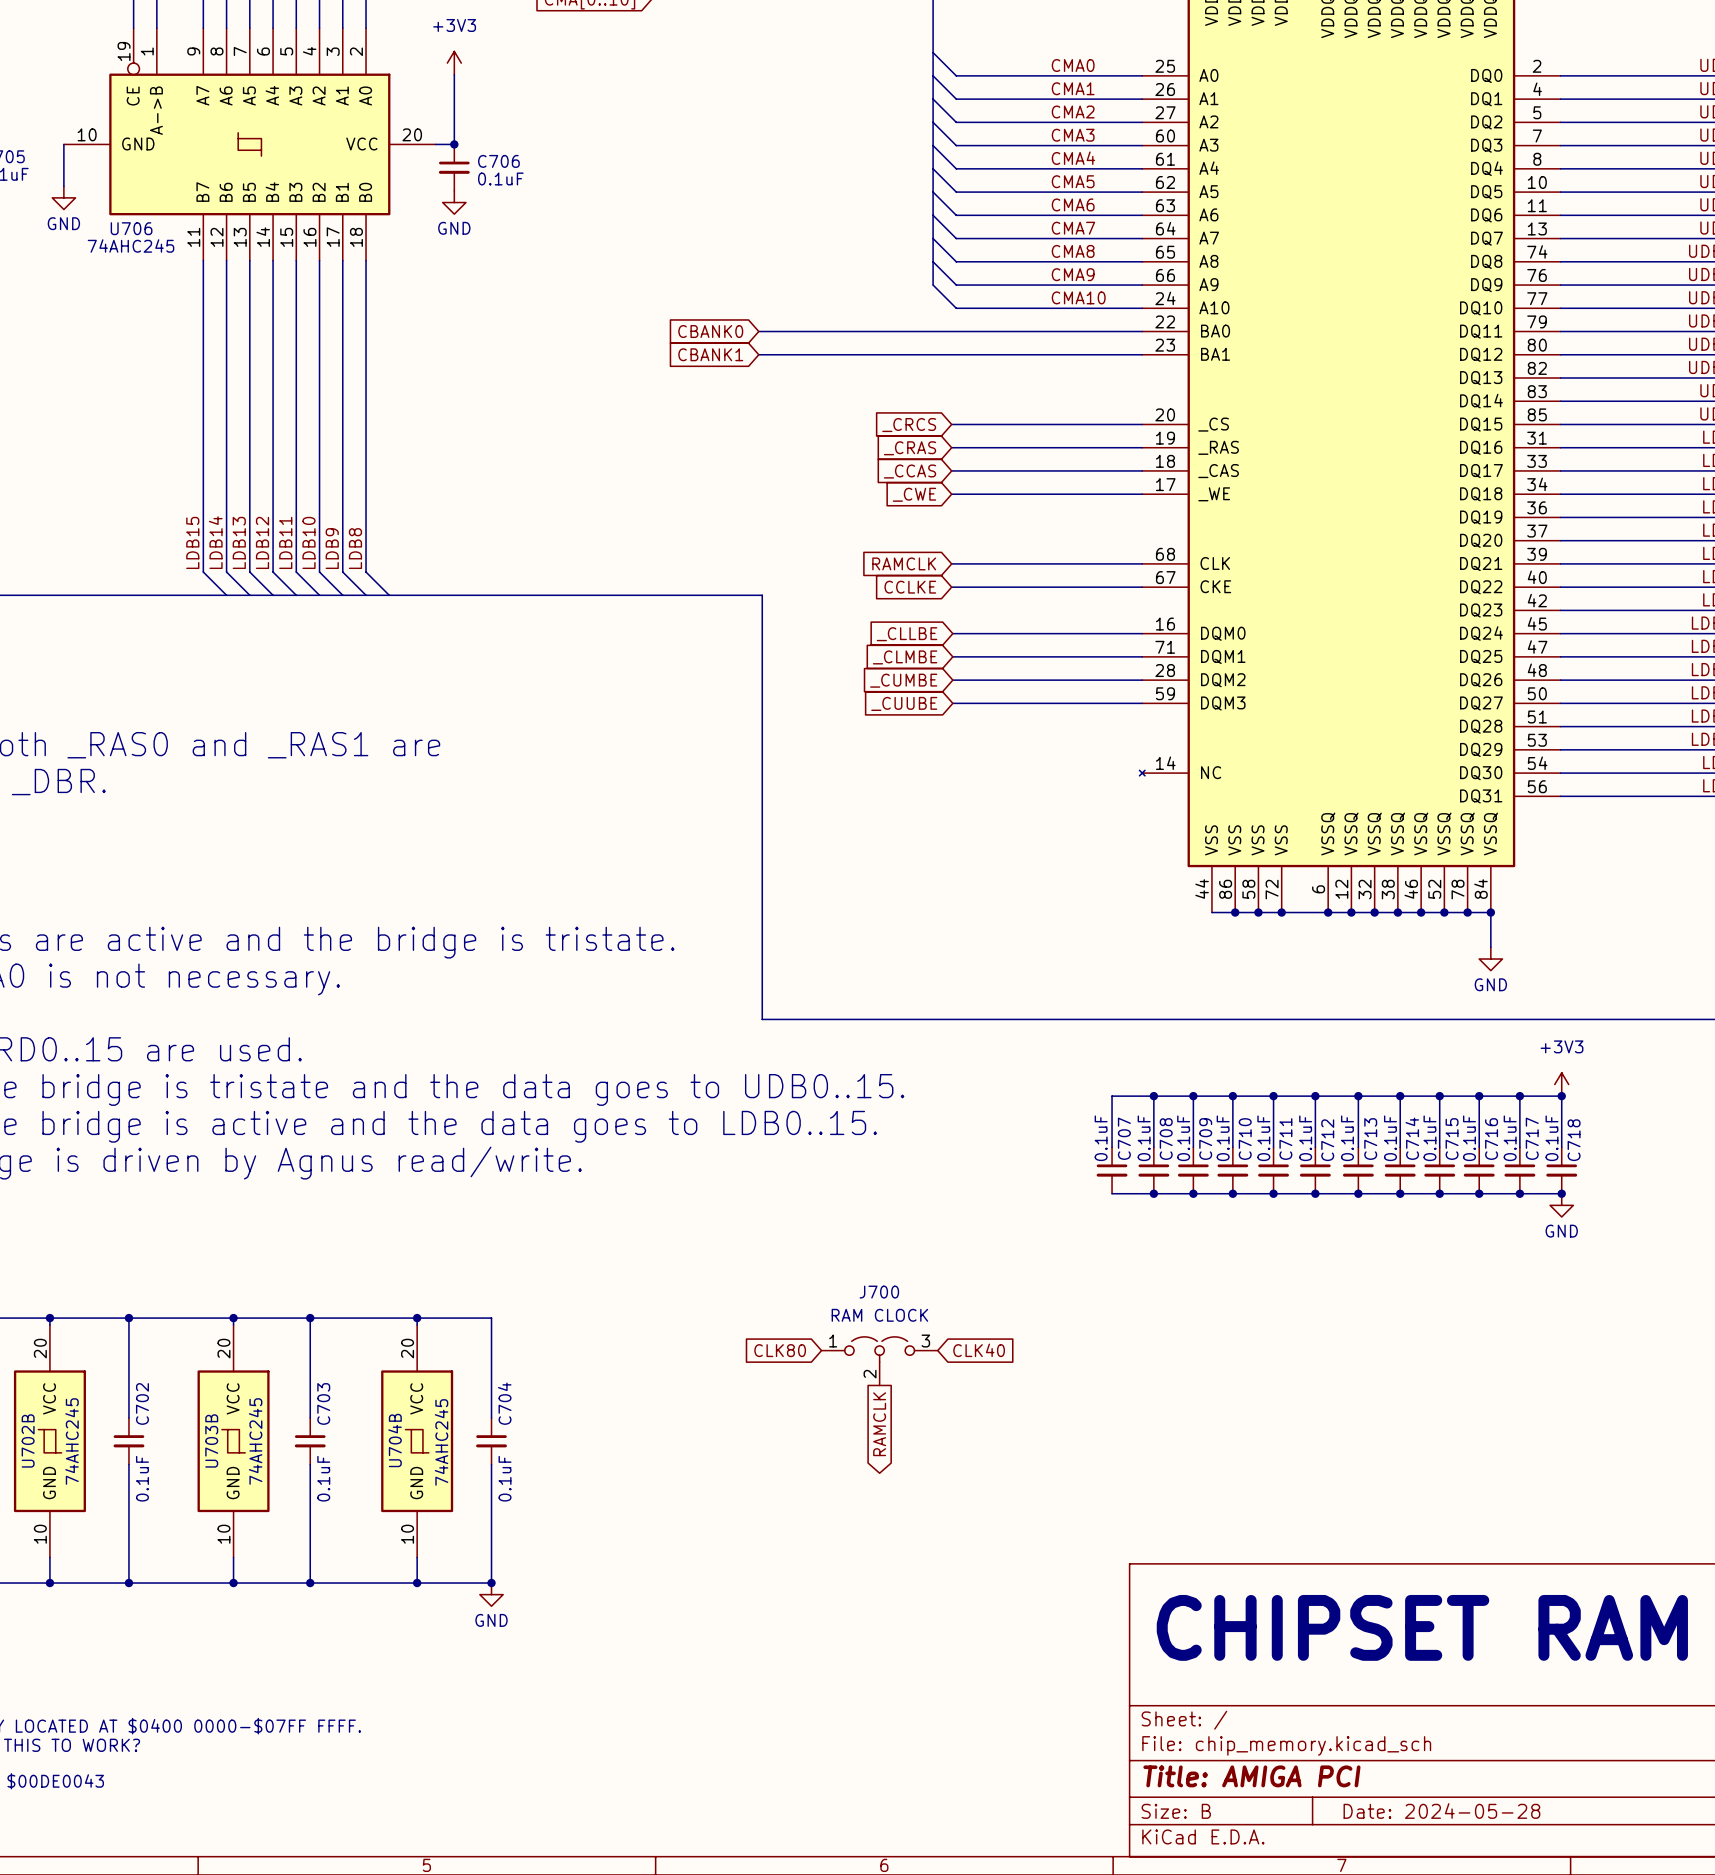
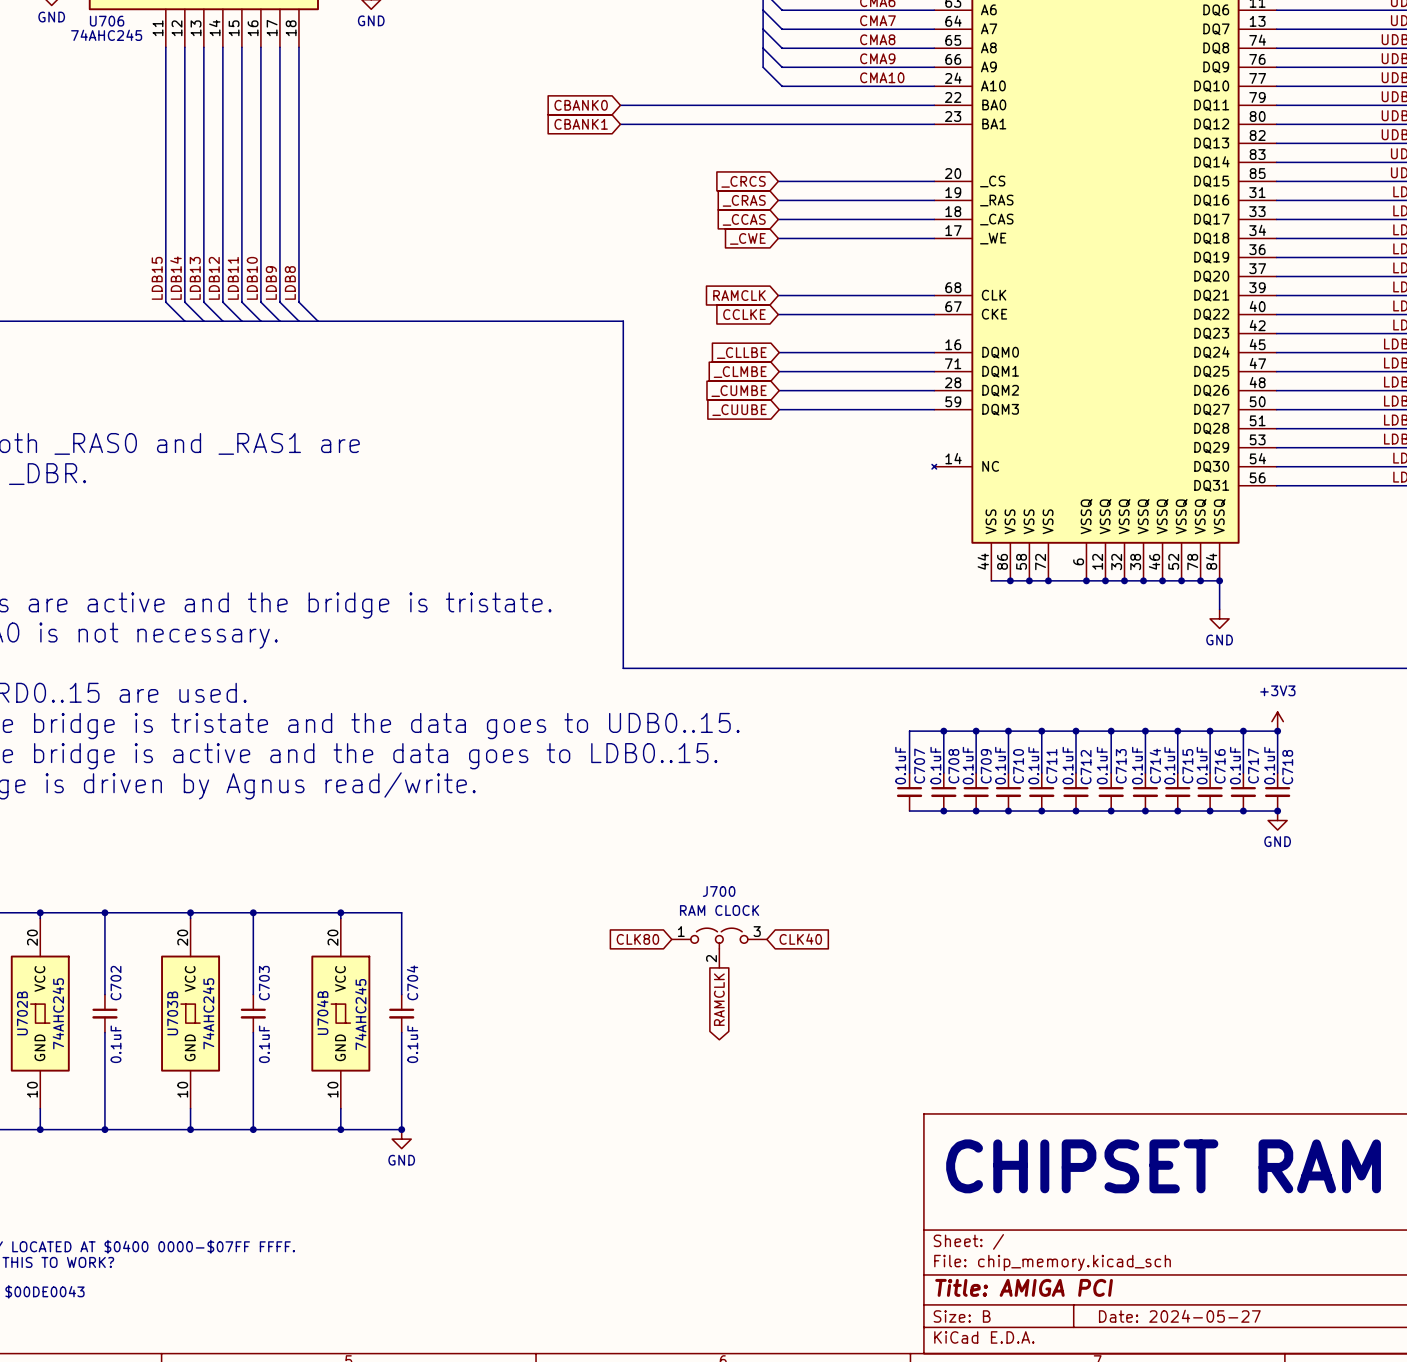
title block: Date: 2024-05-28 (1441, 1811) -> Date: 2024-05-27 (1179, 1316)

